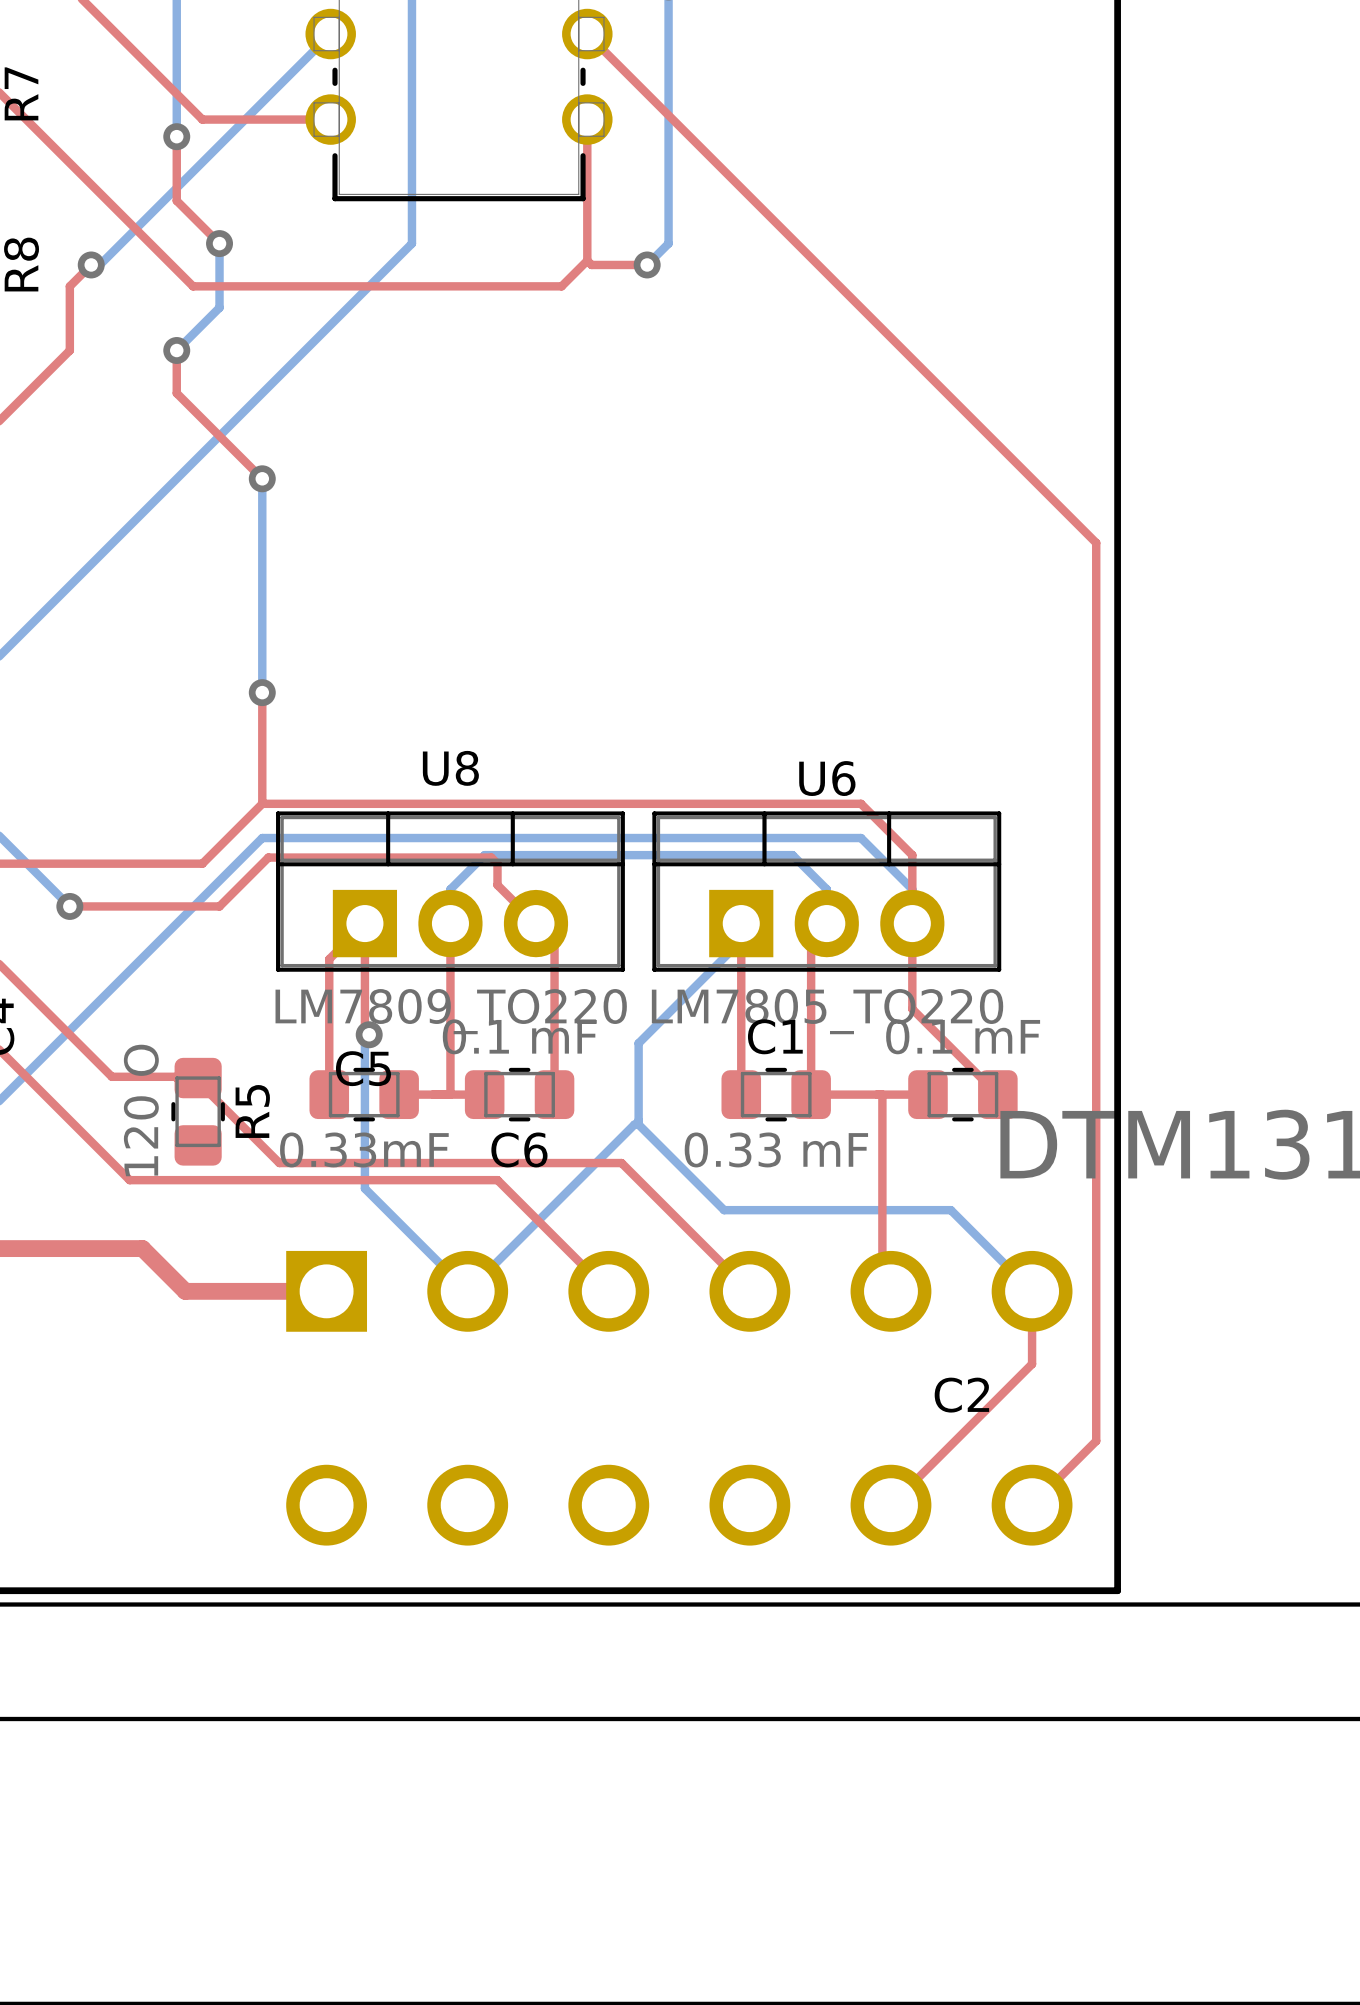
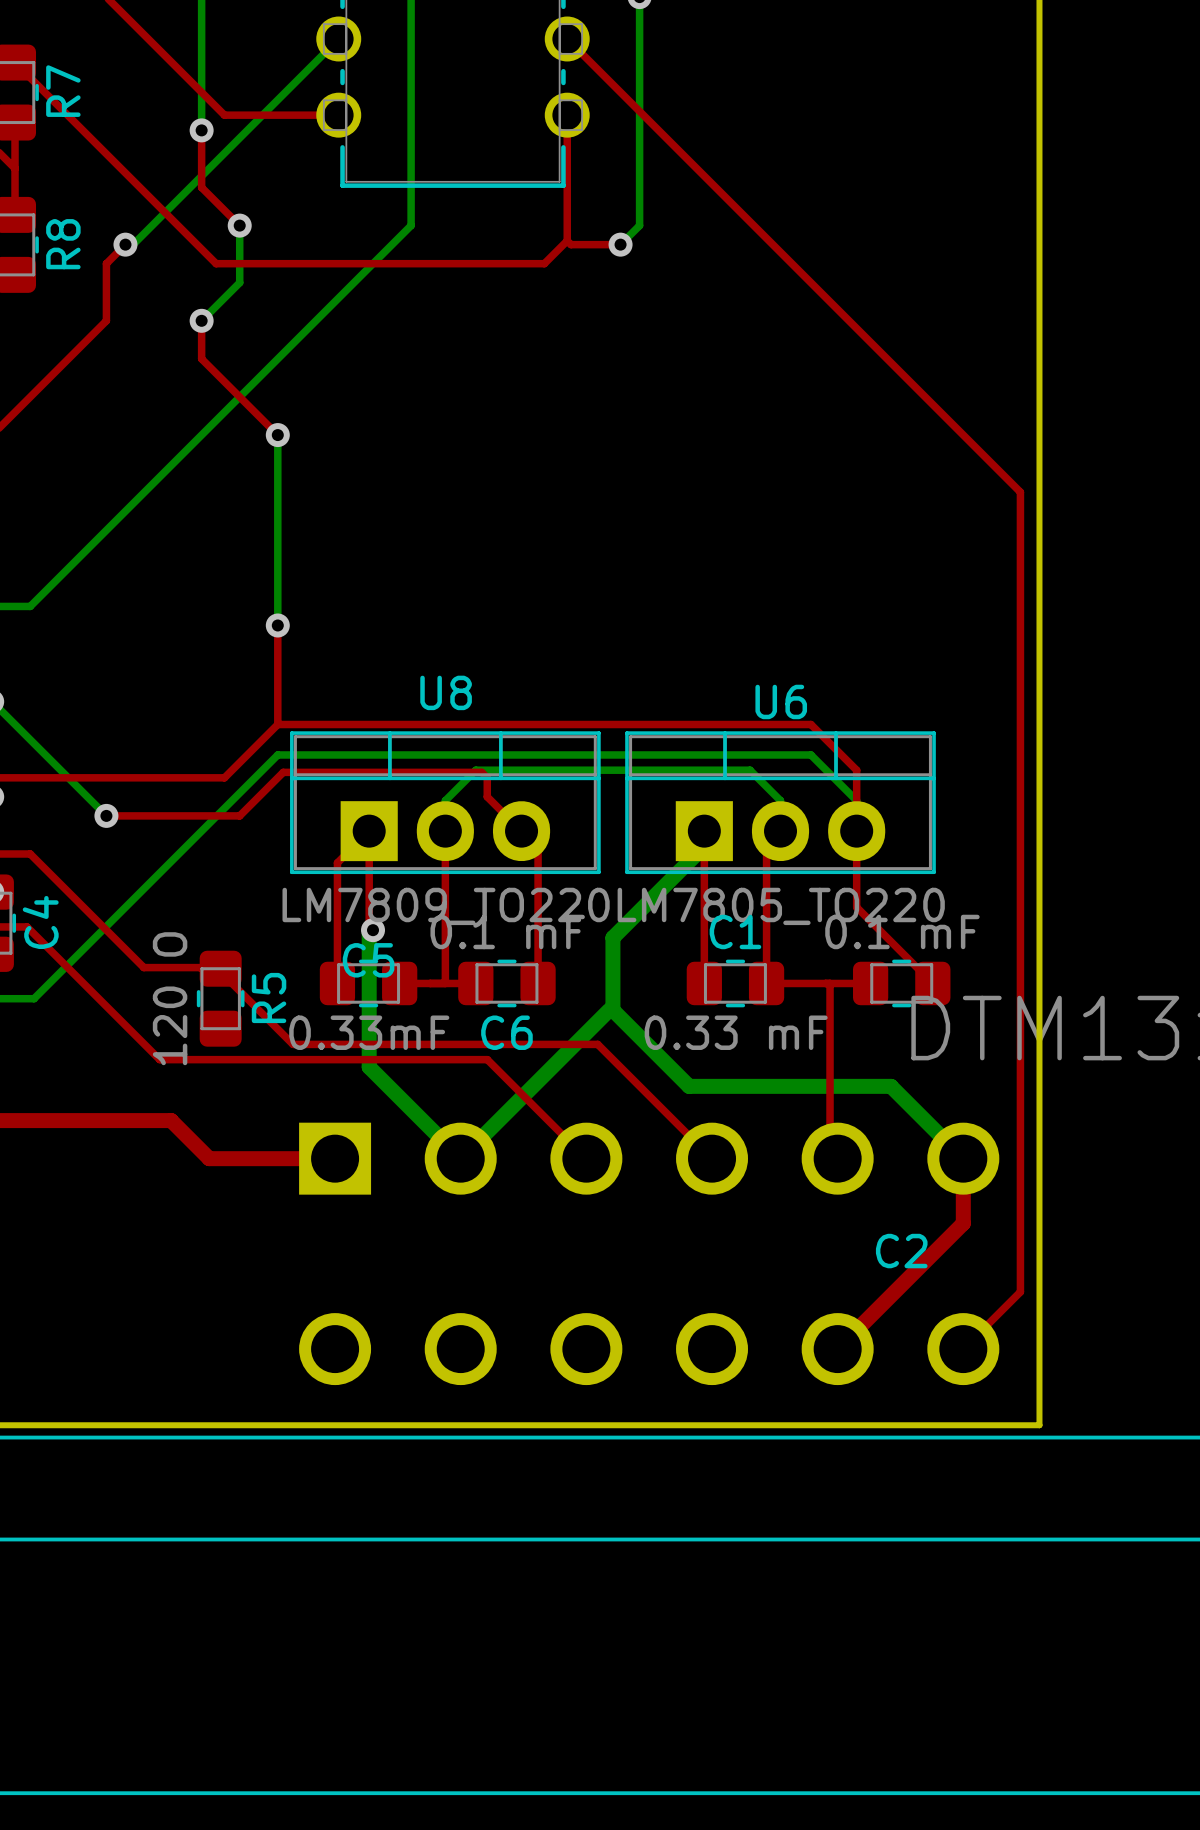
bottom track width: thin (741, 940) (638, 1043) (638, 1120) -> thick (704, 846) (612, 937) (612, 1006)
bottom track width: thin (364, 1039) (364, 1188) (467, 1291) (634, 1124) -> thick (369, 933) (369, 1067) (460, 1158) (609, 1010)
bottom track width: thin (638, 1124) (724, 1210) (950, 1210) (1032, 1291) -> thick (612, 1010) (689, 1086) (891, 1086) (963, 1158)
top track width: thin (1032, 1291) (1032, 1364) (890, 1505) -> thick (963, 1158) (963, 1223) (837, 1349)

